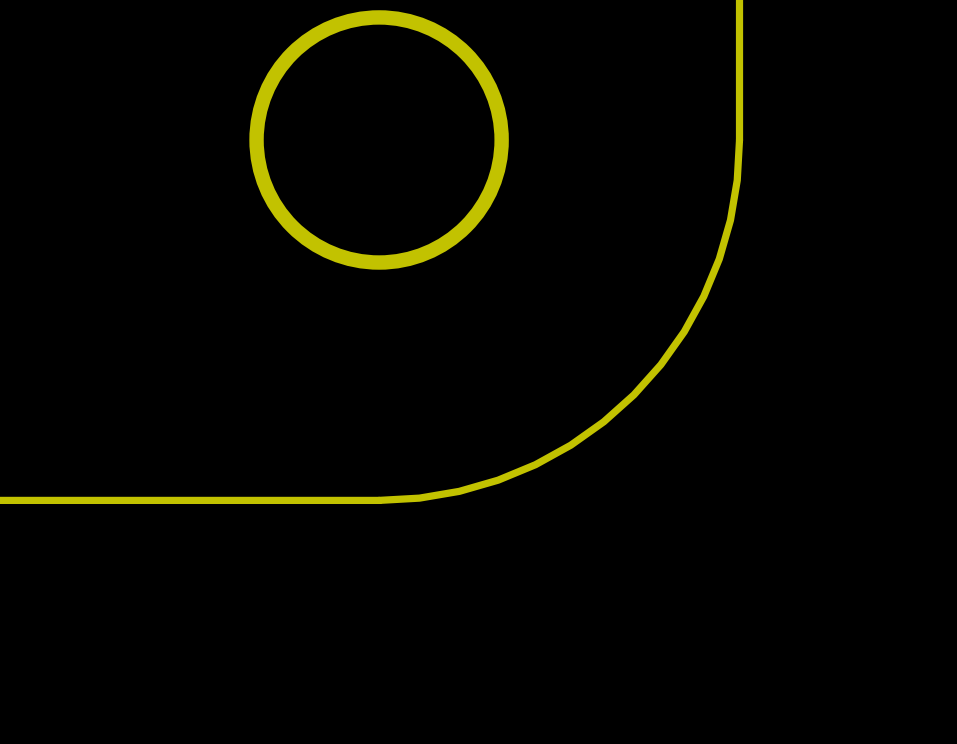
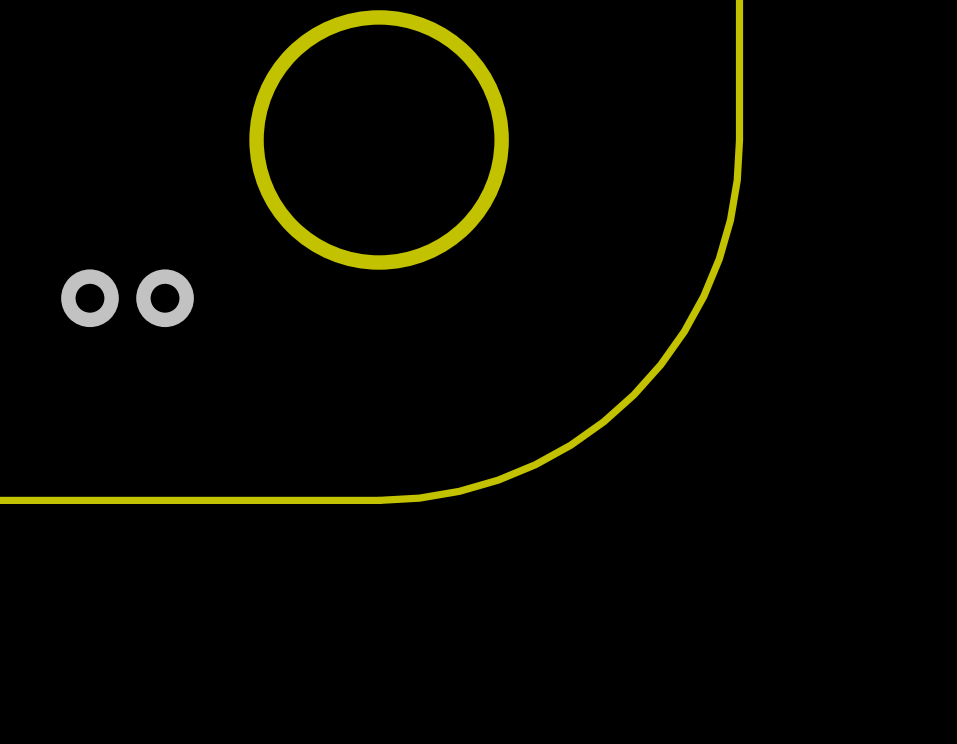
via: none -> (89, 298)
via: none -> (165, 298)

